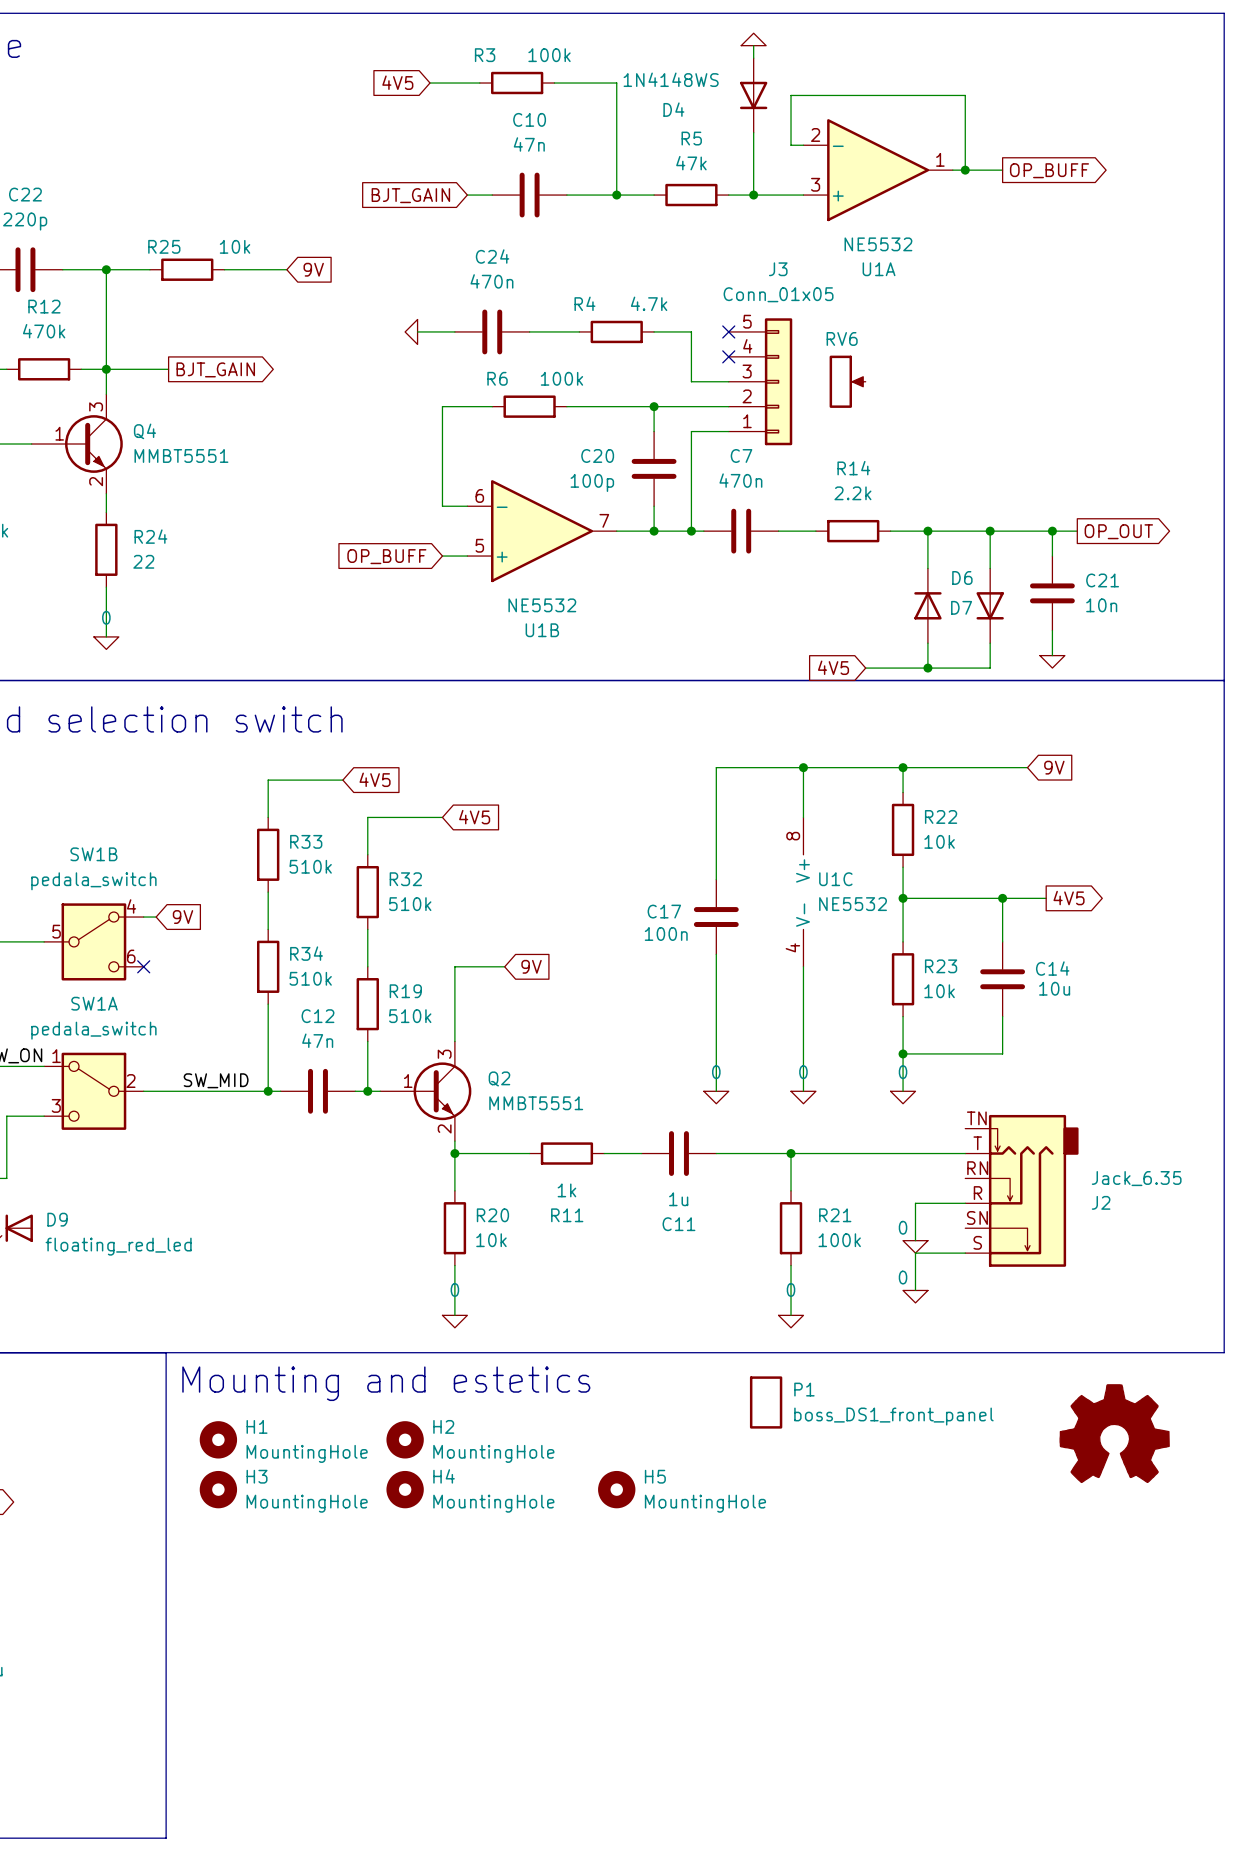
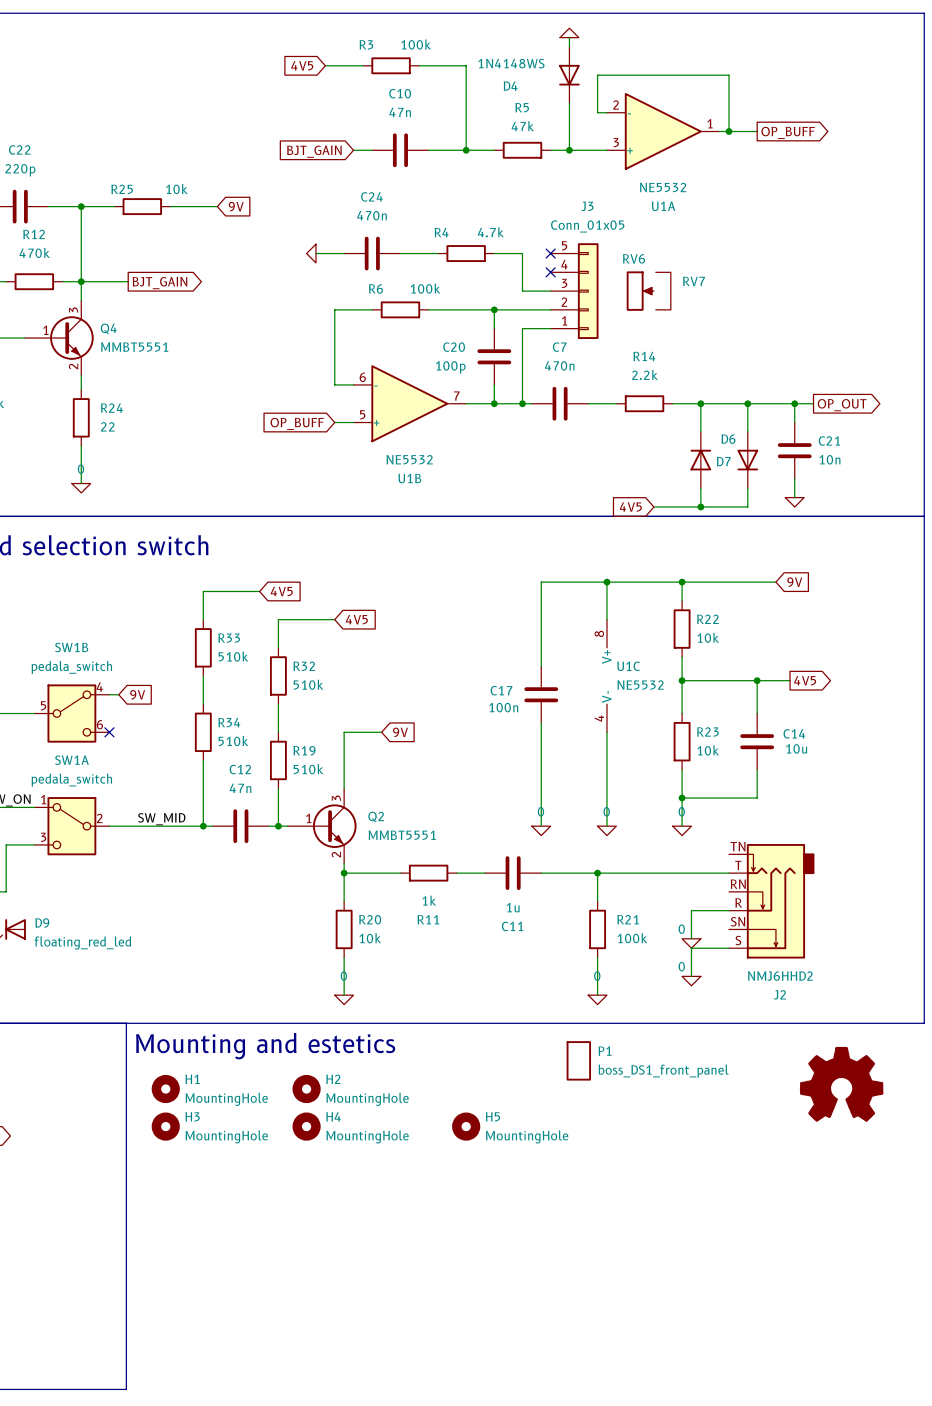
RV7: none -> (663, 291)
J2 value: Jack_6.35 (1136, 1178) -> NMJ6HHD2 (780, 976)
J2 name position: J2 (1101, 1202) -> J2 (779, 994)

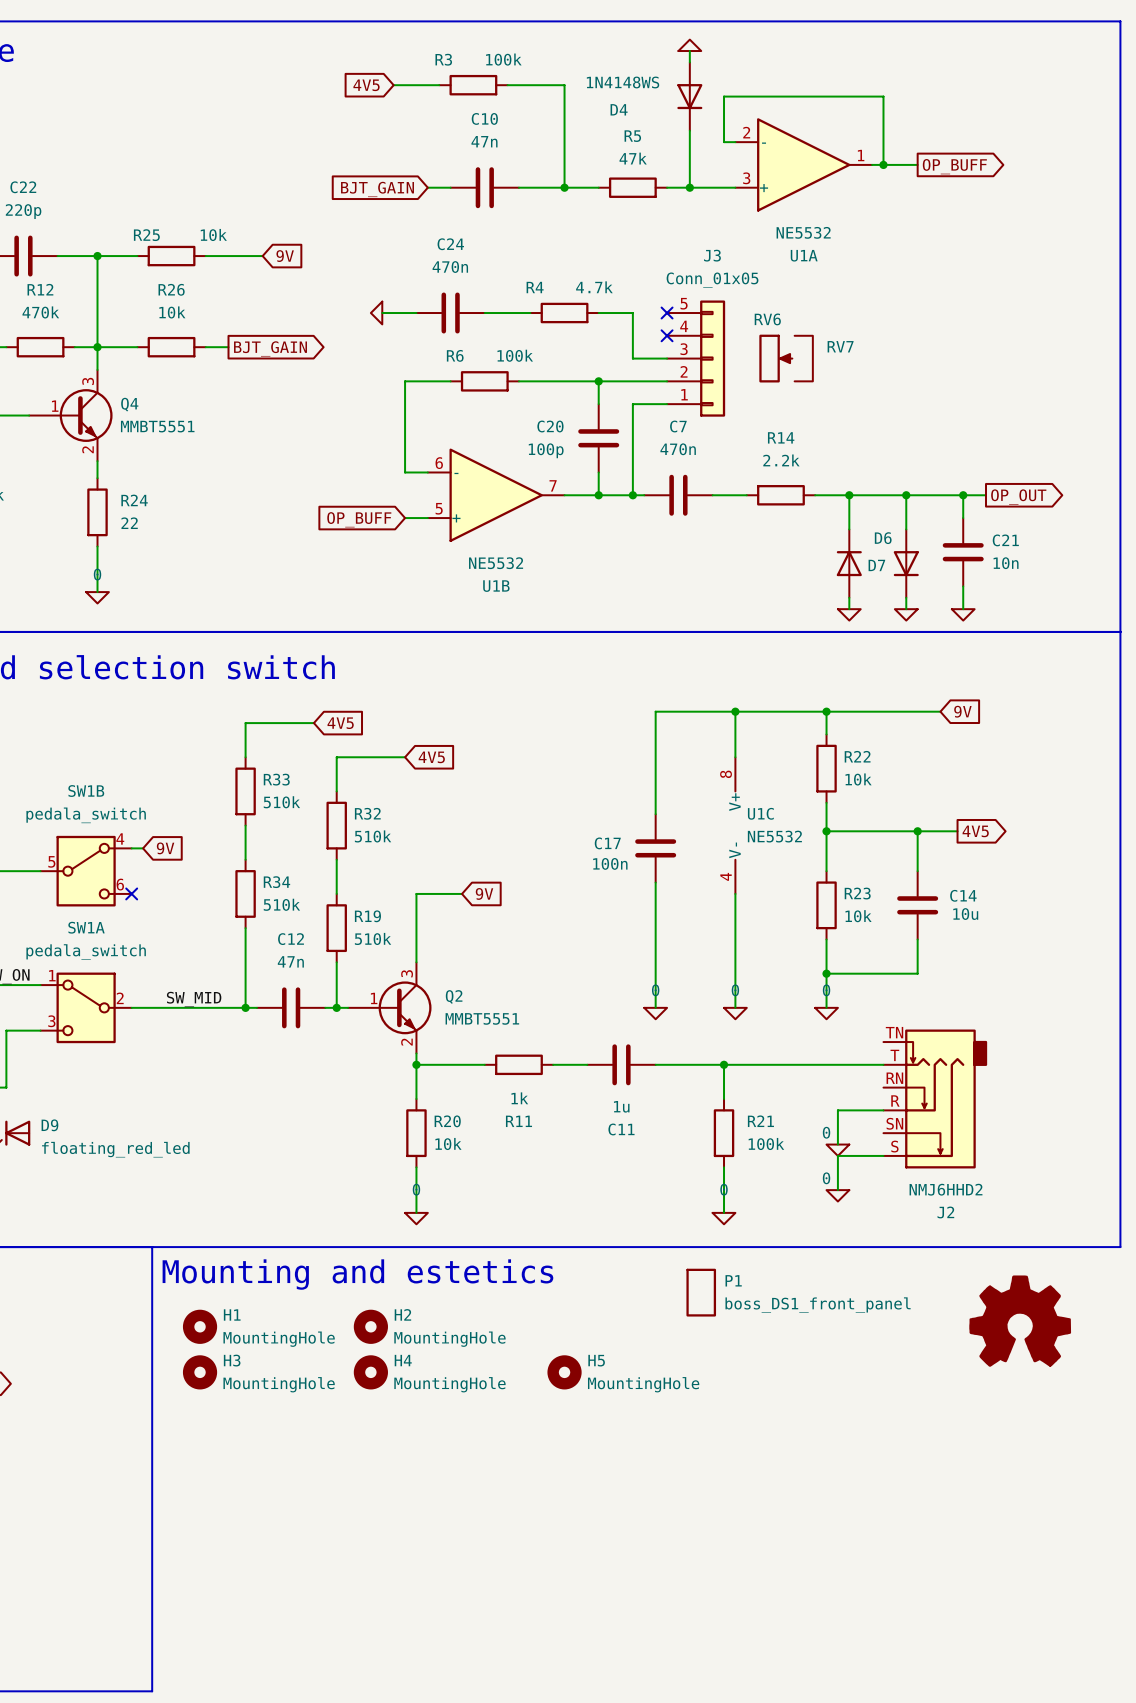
R26: none -> 10k (171, 347)
wire: none -> (205, 347) (228, 347)
global label position: BJT_GAIN (160, 283) -> BJT_GAIN (270, 348)
wire: (700, 497) (700, 507) -> none
wire: (747, 497) (747, 507) (653, 507) -> none
power symbol: none -> (849, 614)
power symbol: none -> (906, 614)
global label: 4V5 (630, 507) -> none
junction: (700, 507) -> none

